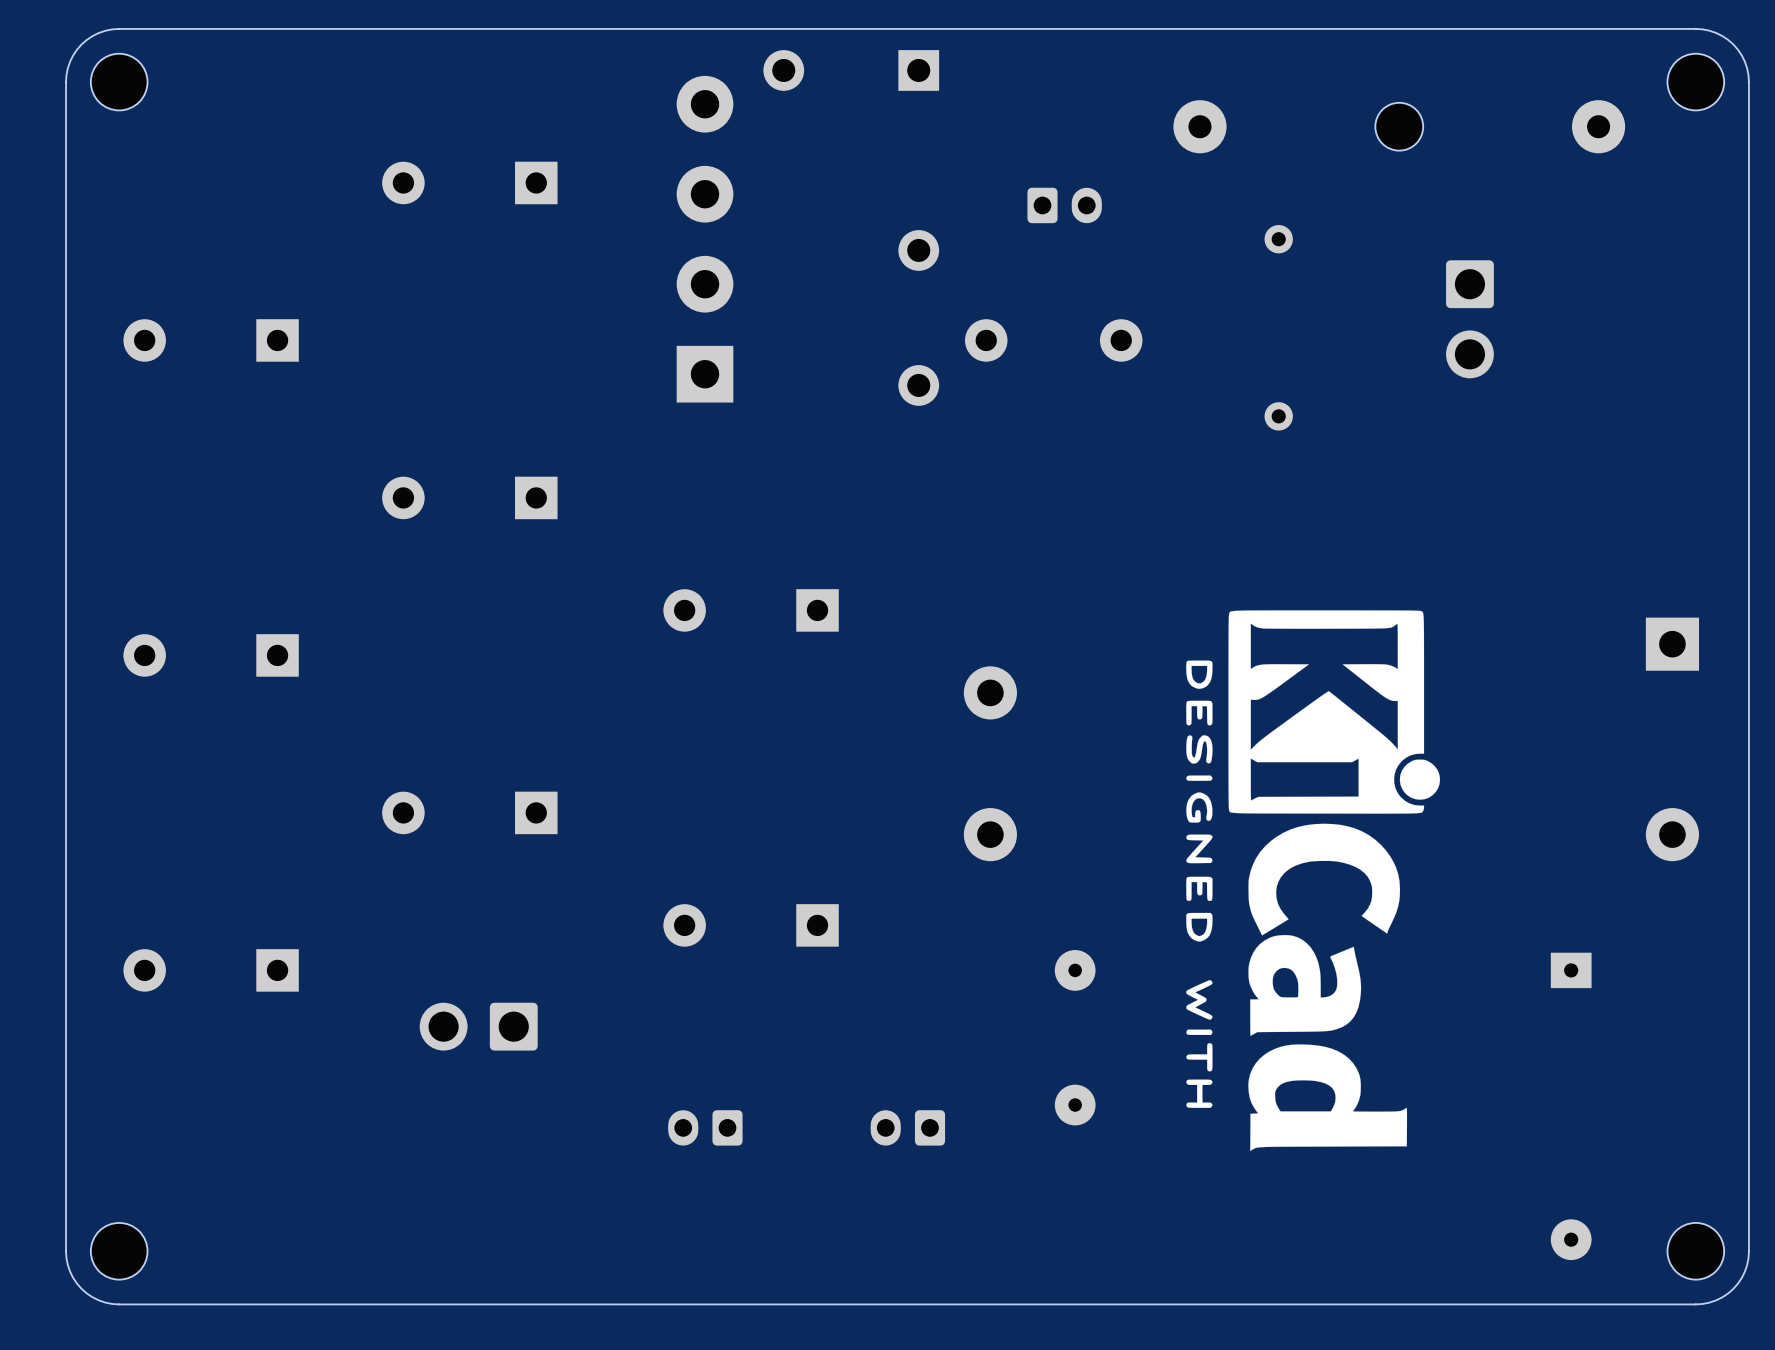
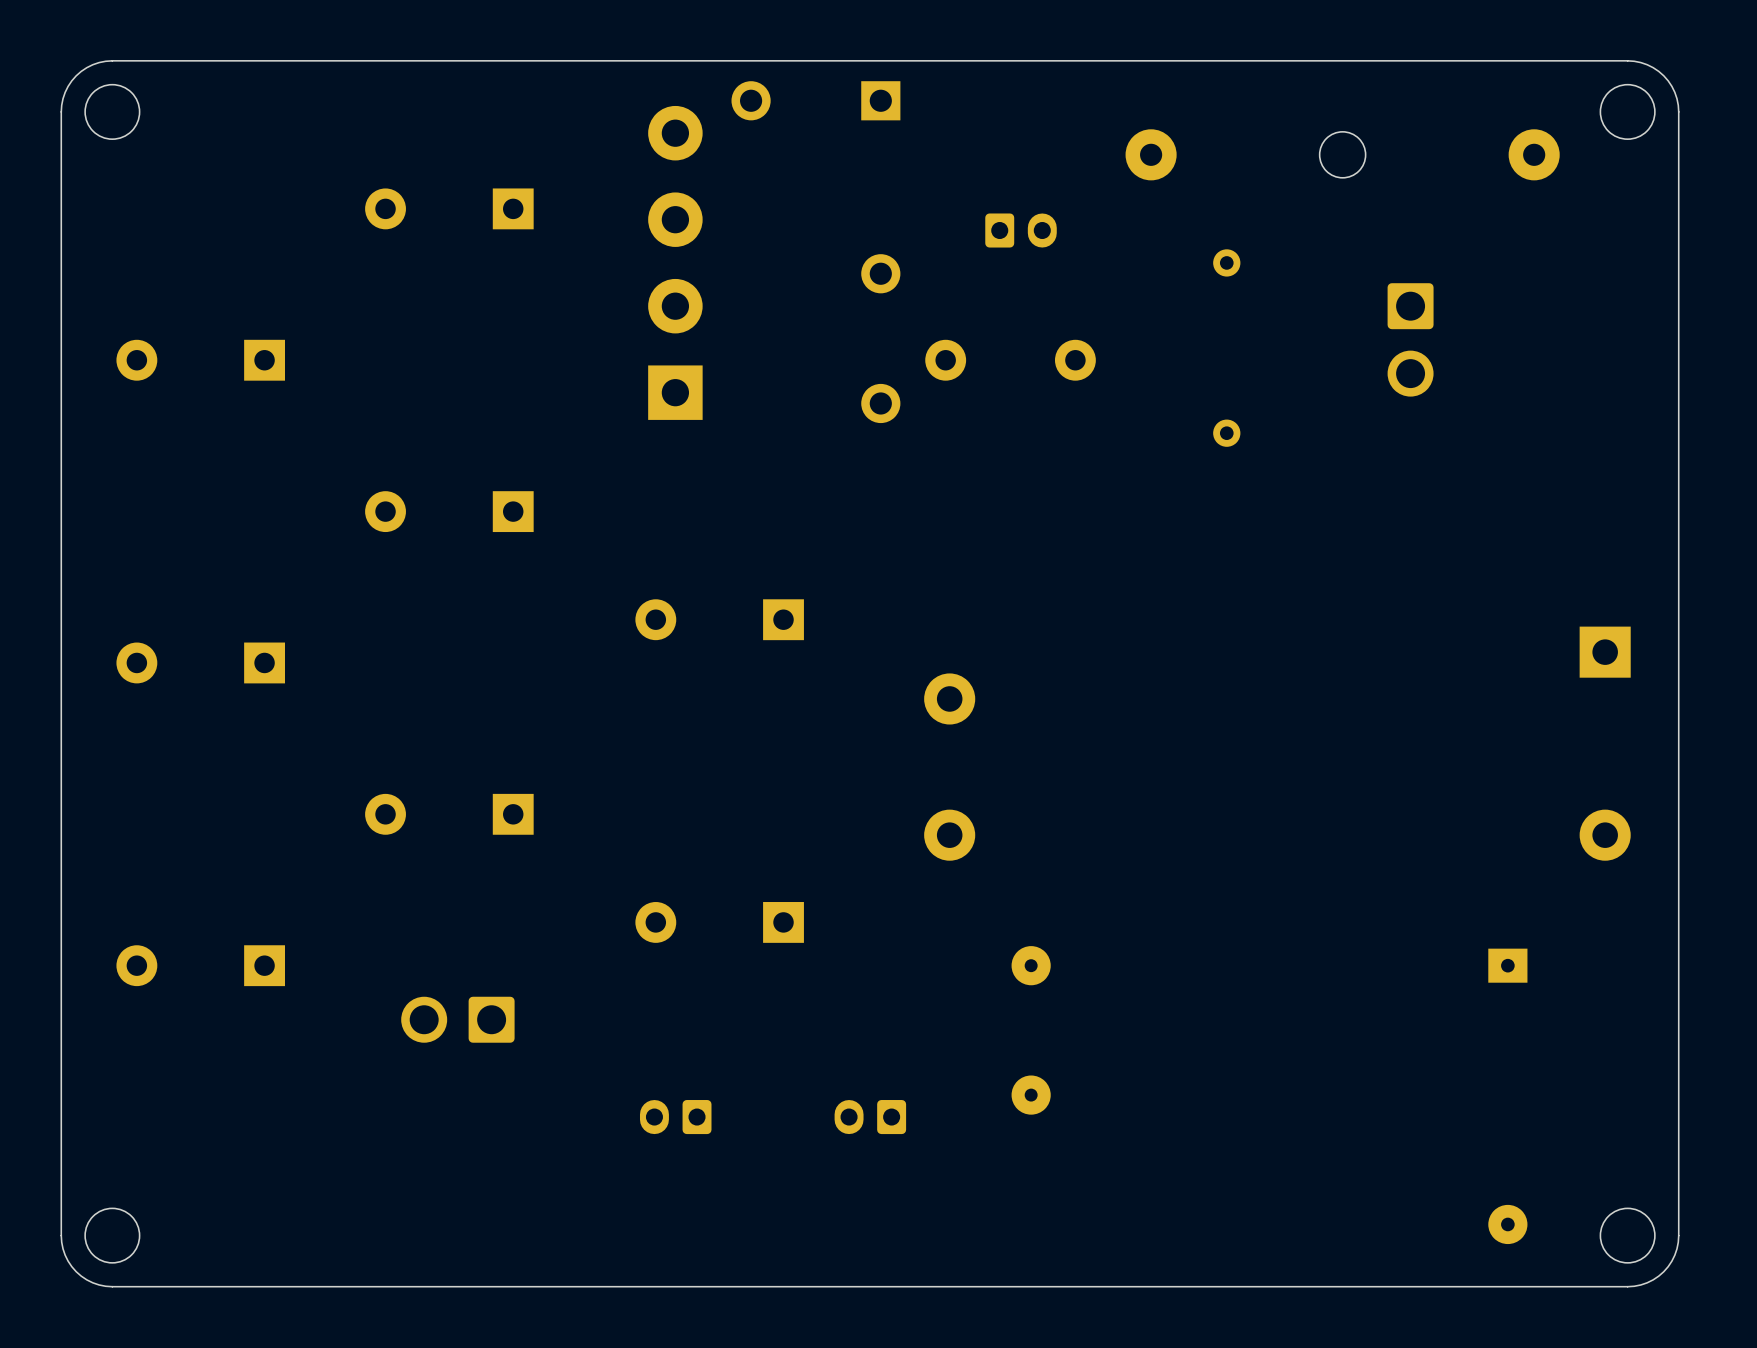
drawing: [1186, 610, 1441, 1152] -> none

